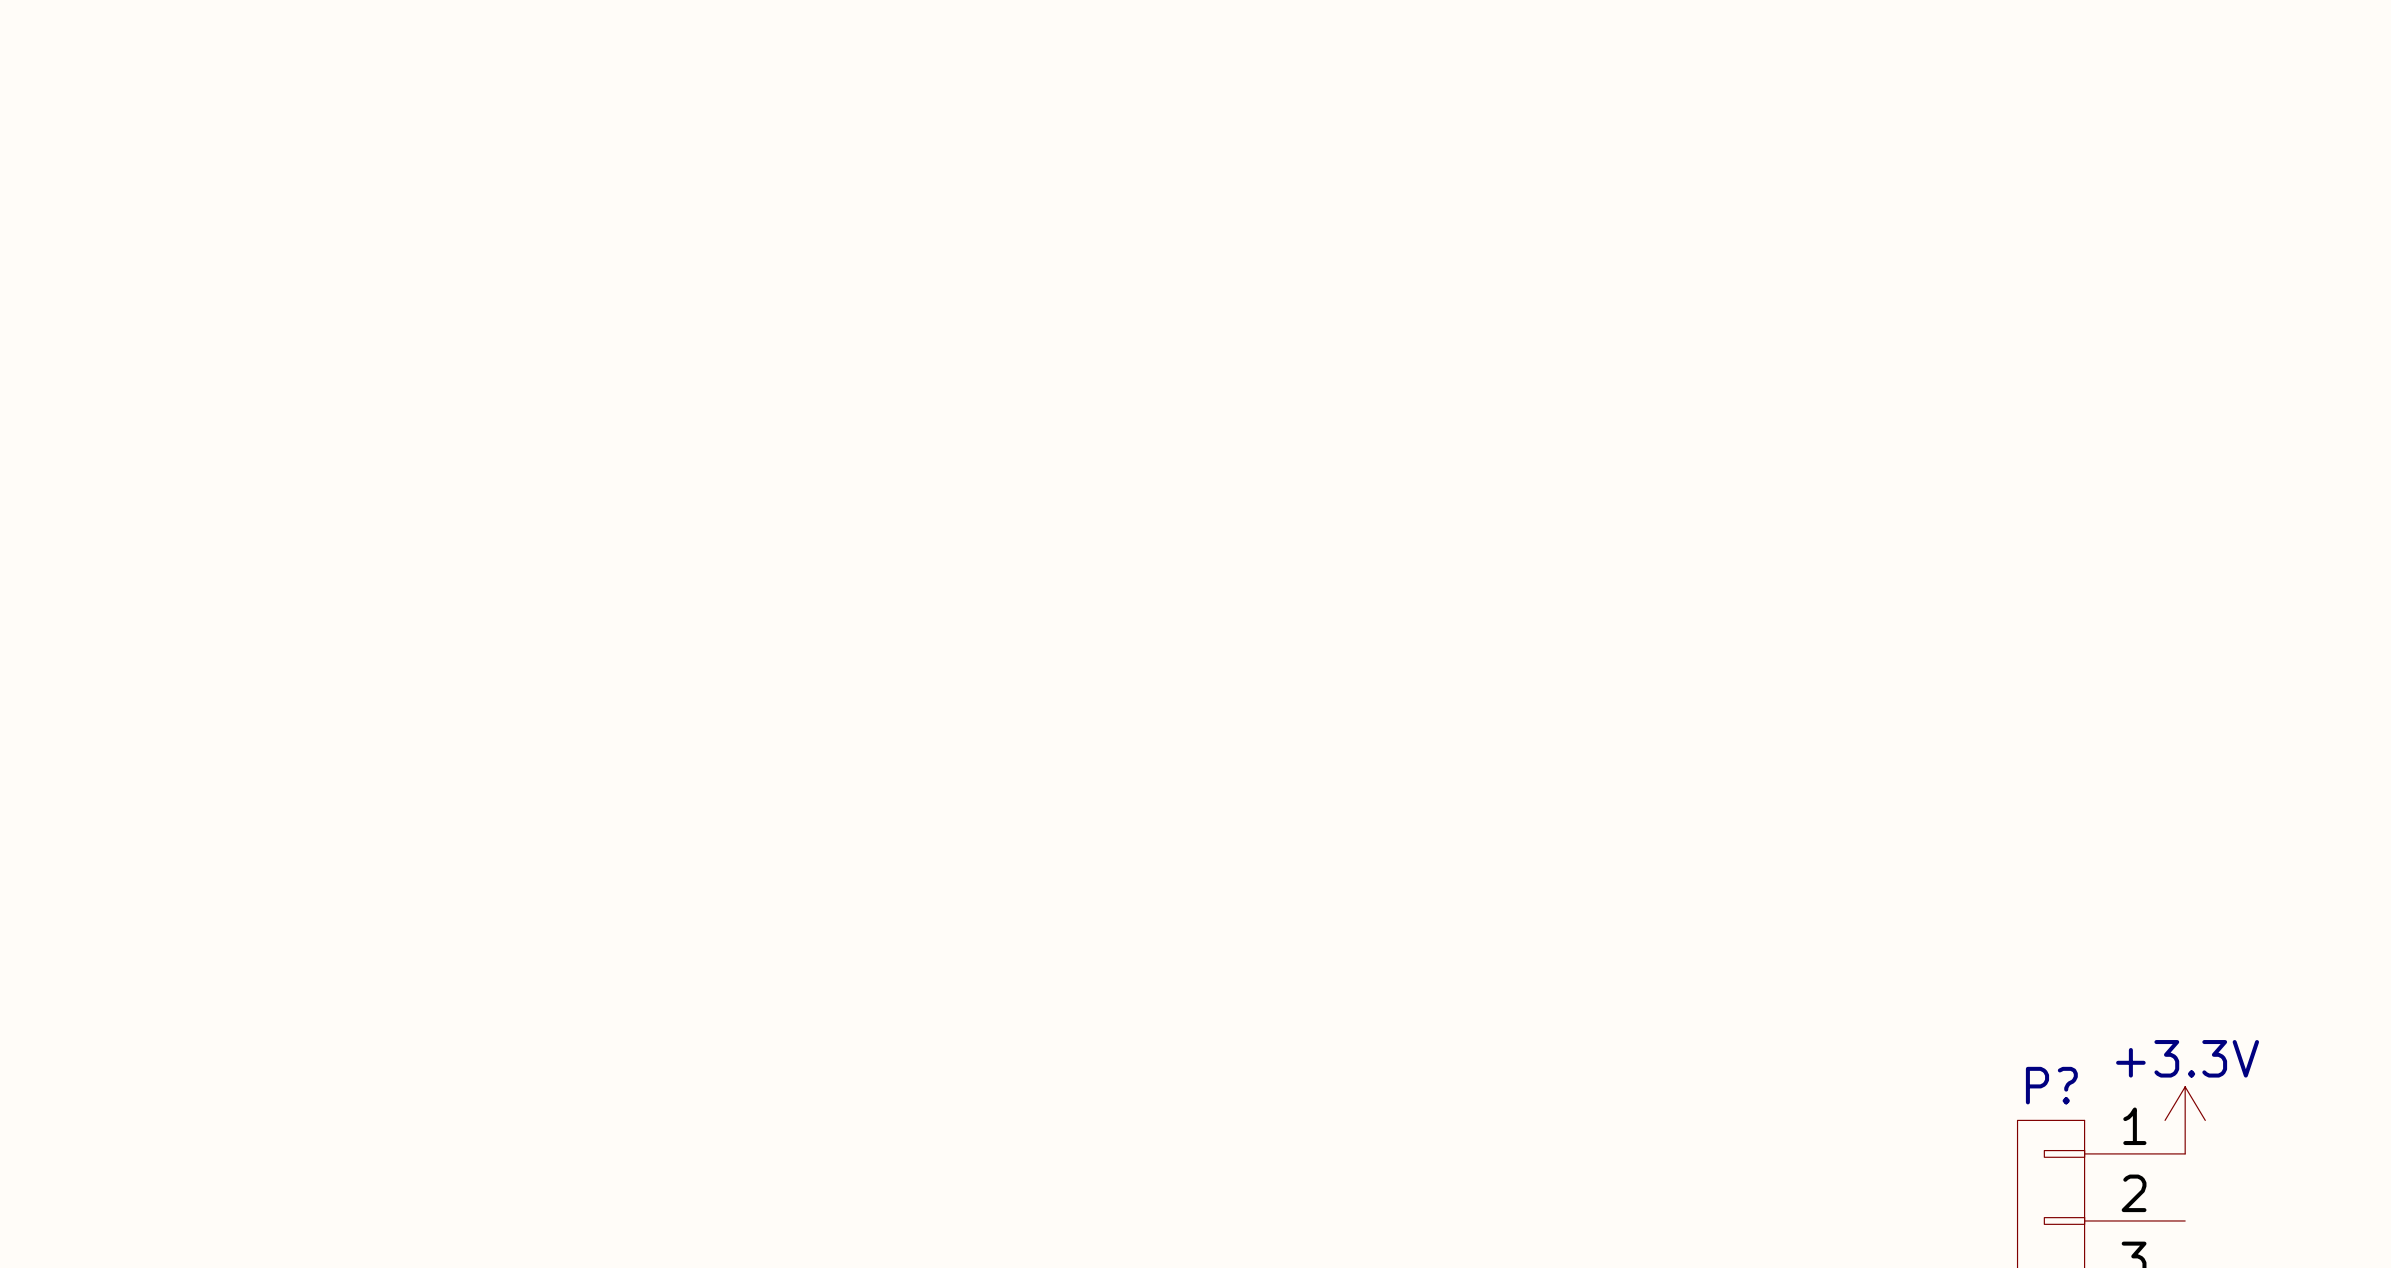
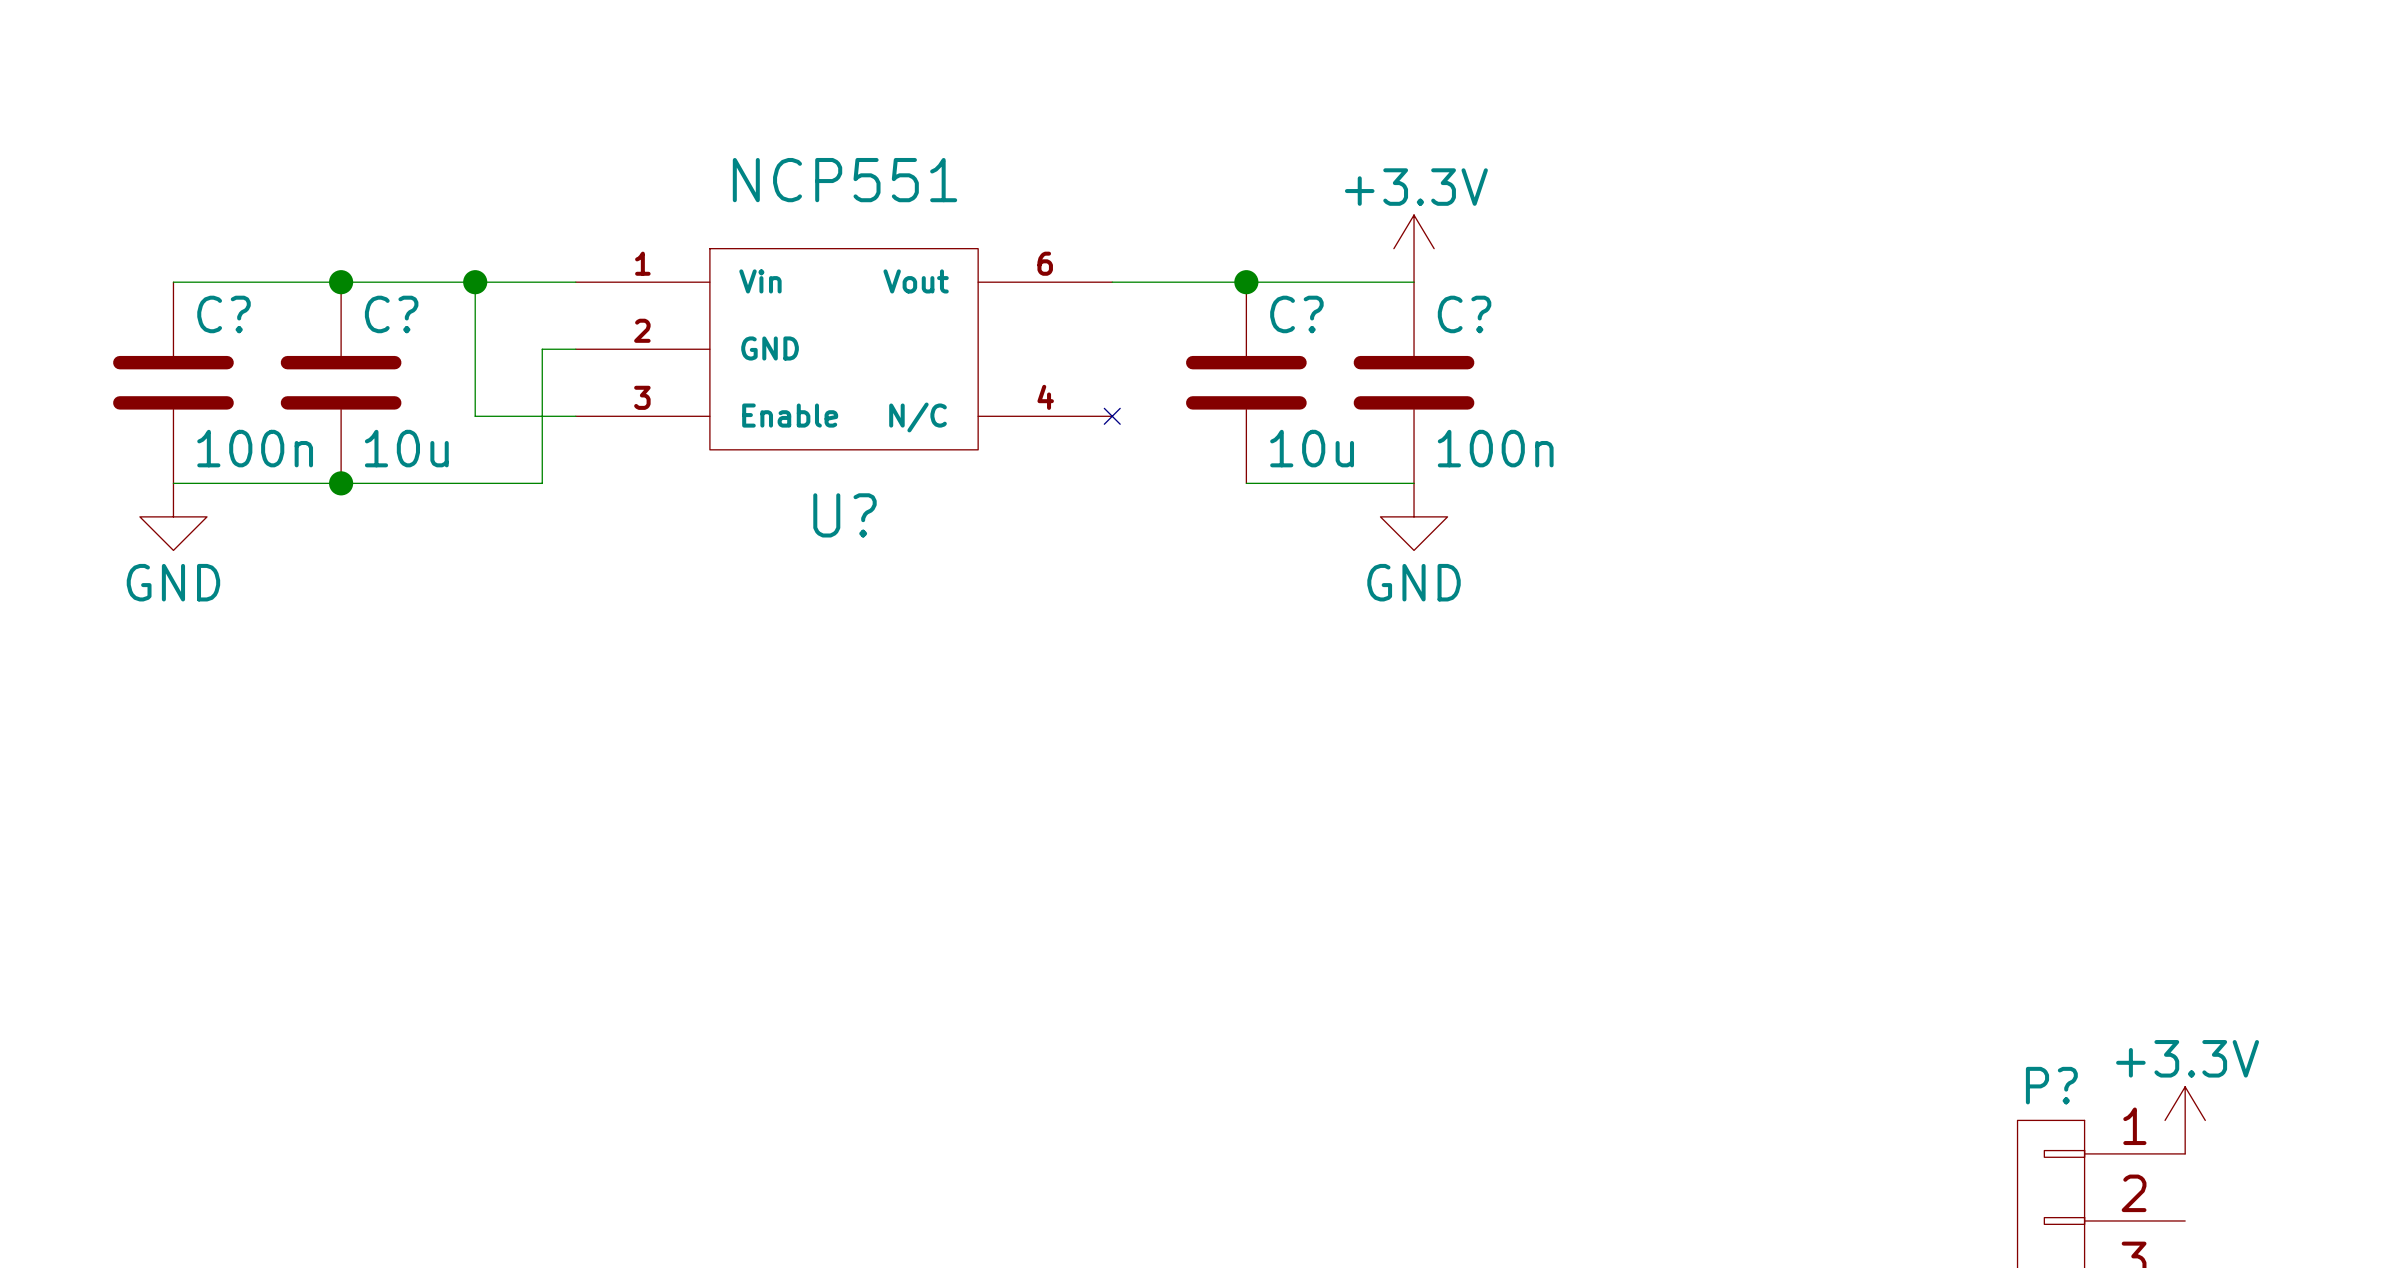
power symbol: none -> +3.3V (1414, 248)
wire: none -> (173, 282) (575, 282)
junction: none -> (341, 282)
wire: none -> (475, 282) (475, 416) (575, 416)
junction: none -> (475, 282)
wire: none -> (1112, 282) (1414, 282)
junction: none -> (1246, 282)
wire: none -> (575, 349) (542, 349) (542, 483) (173, 483)
U?: none -> NCP551 (847, 349)
C?: none -> 100n (173, 382)
C?: none -> 10u (341, 382)
C?: none -> 10u (1246, 382)
C?: none -> 100n (1414, 382)
junction: none -> (341, 483)
wire: none -> (1246, 483) (1414, 483)
power symbol: none -> GND (173, 516)
power symbol: none -> GND (1414, 516)

